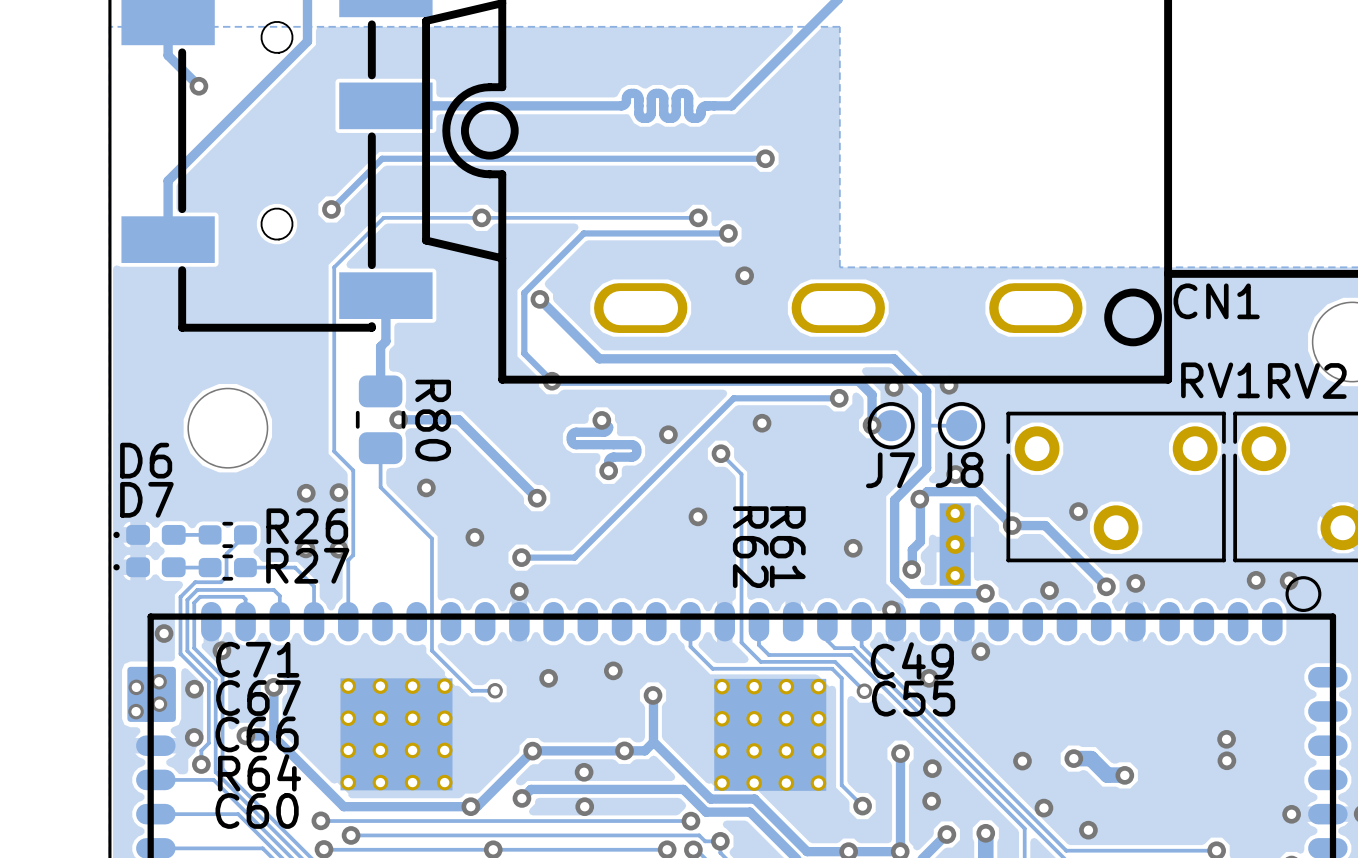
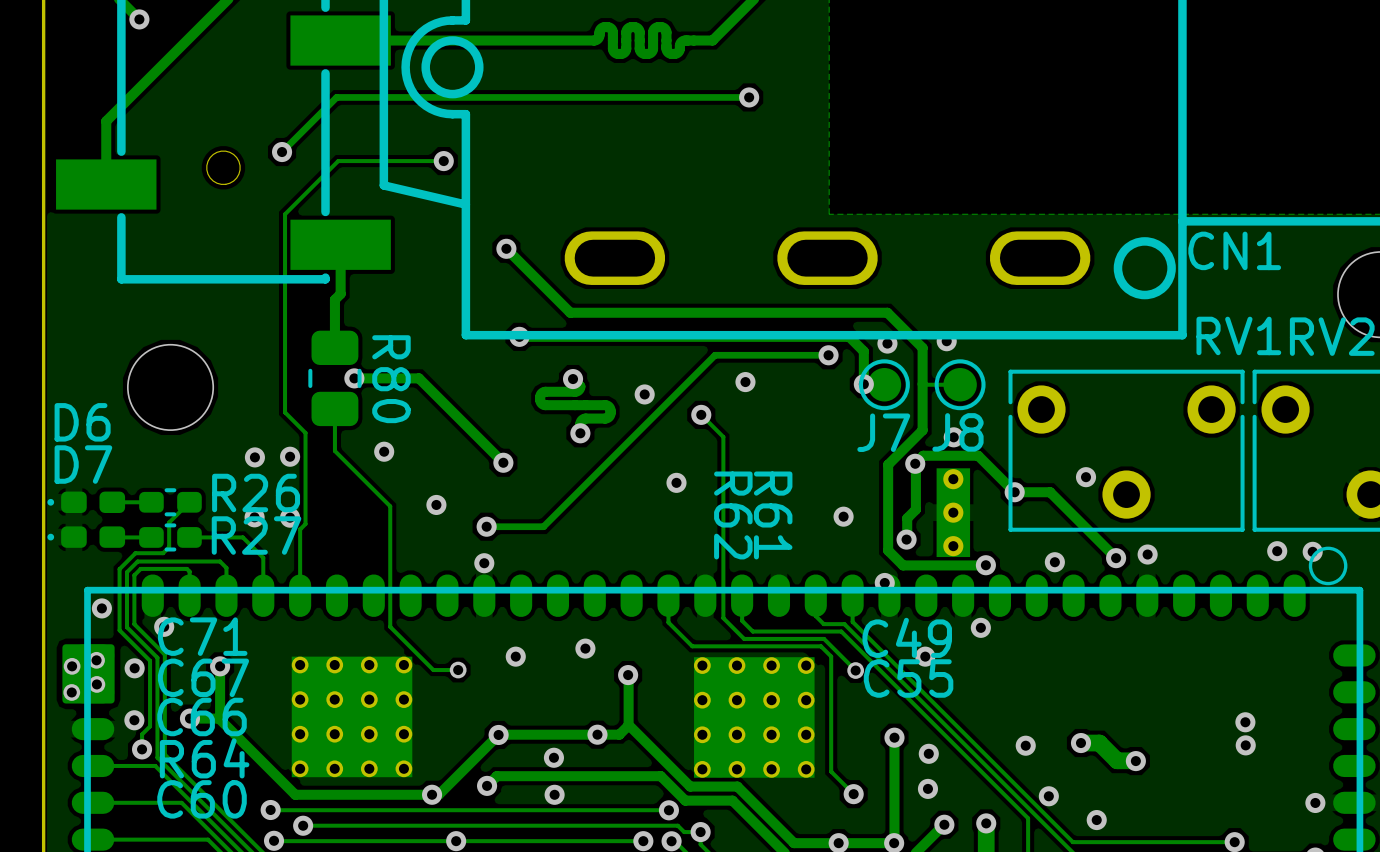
track: (698, 217) (481, 217) -> none
via: (698, 217) -> none
track: (728, 233) (583, 233) (524, 292) (524, 353) (552, 381) -> none
via: (728, 233) -> none
via: (744, 275) -> none

